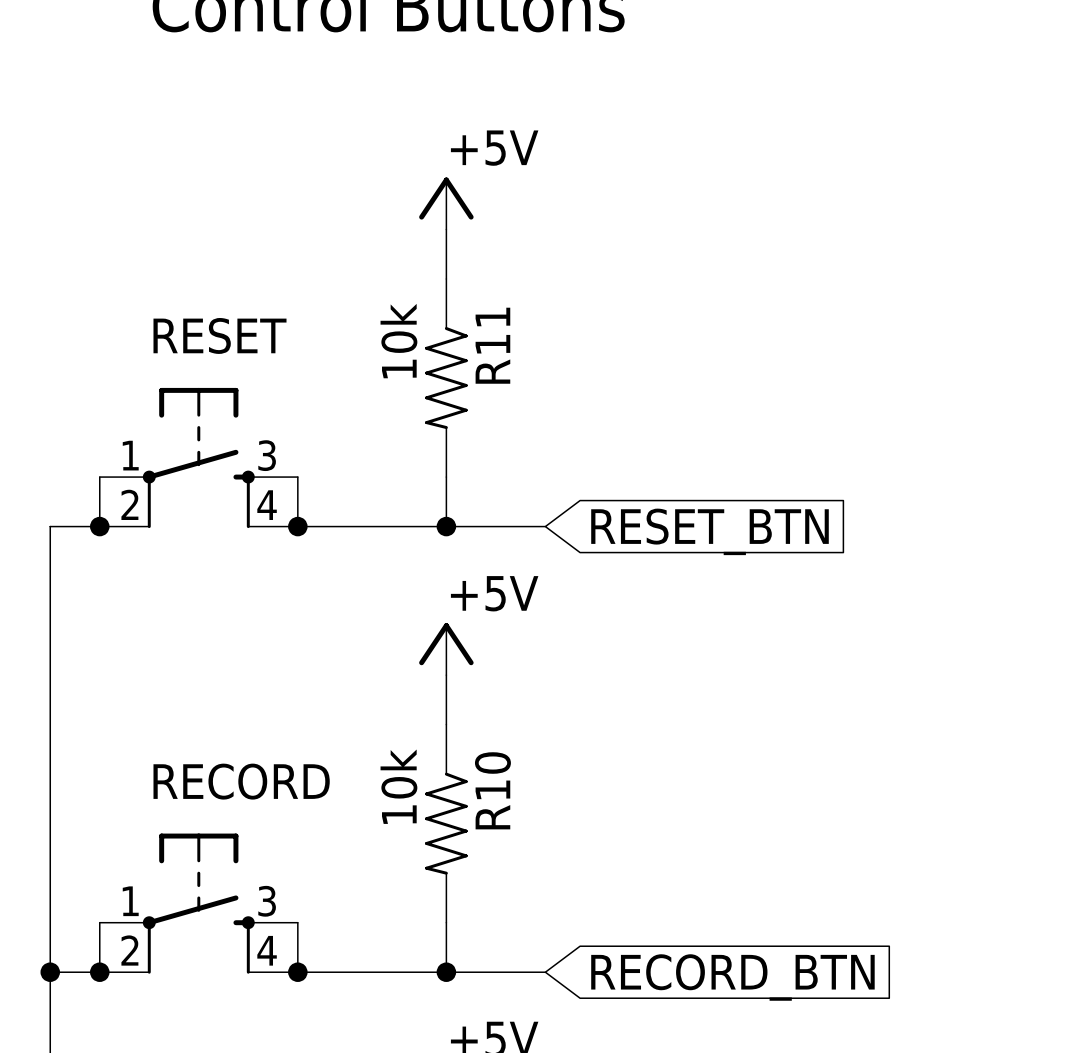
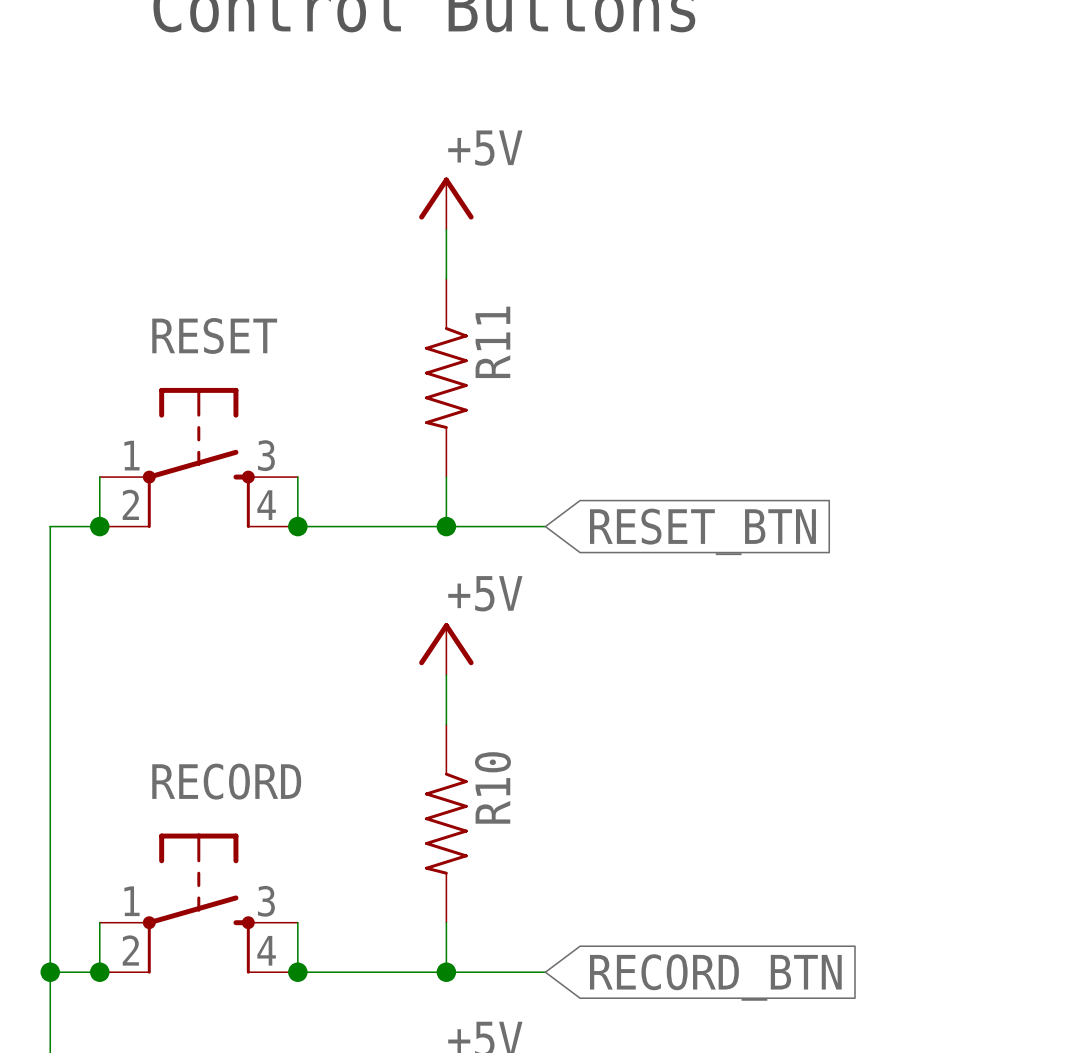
R11 value: 10k (398, 341) -> none
R10 value: 10k (398, 786) -> none

